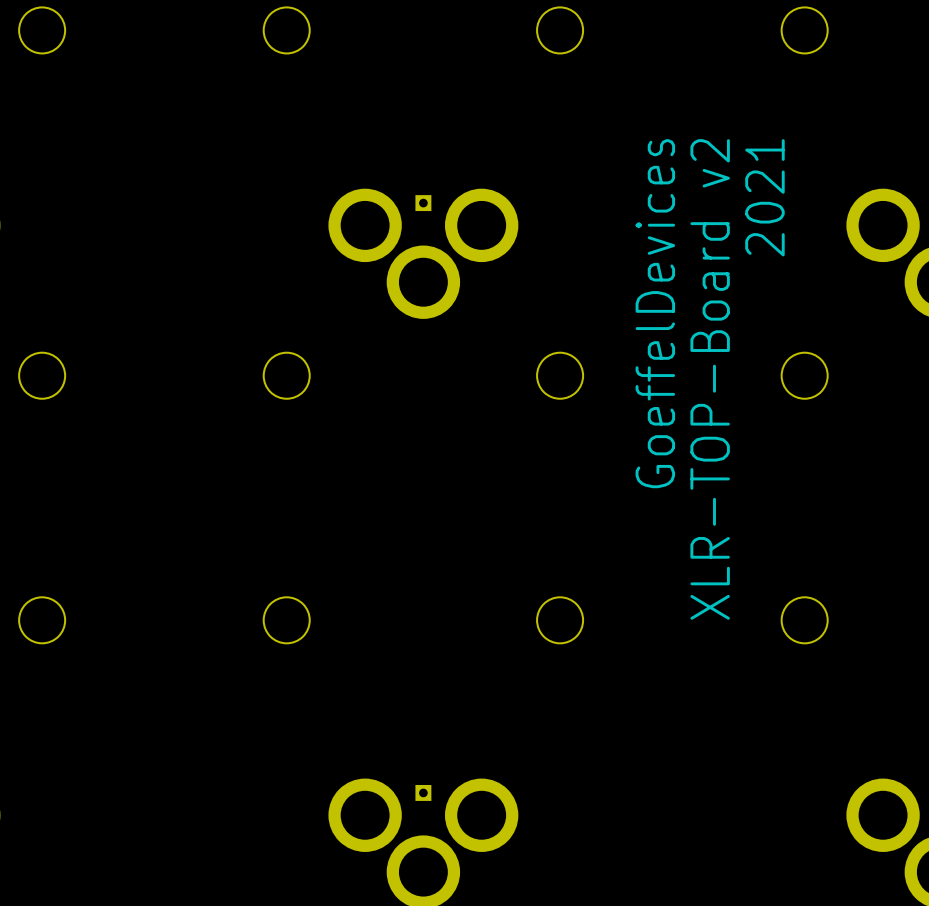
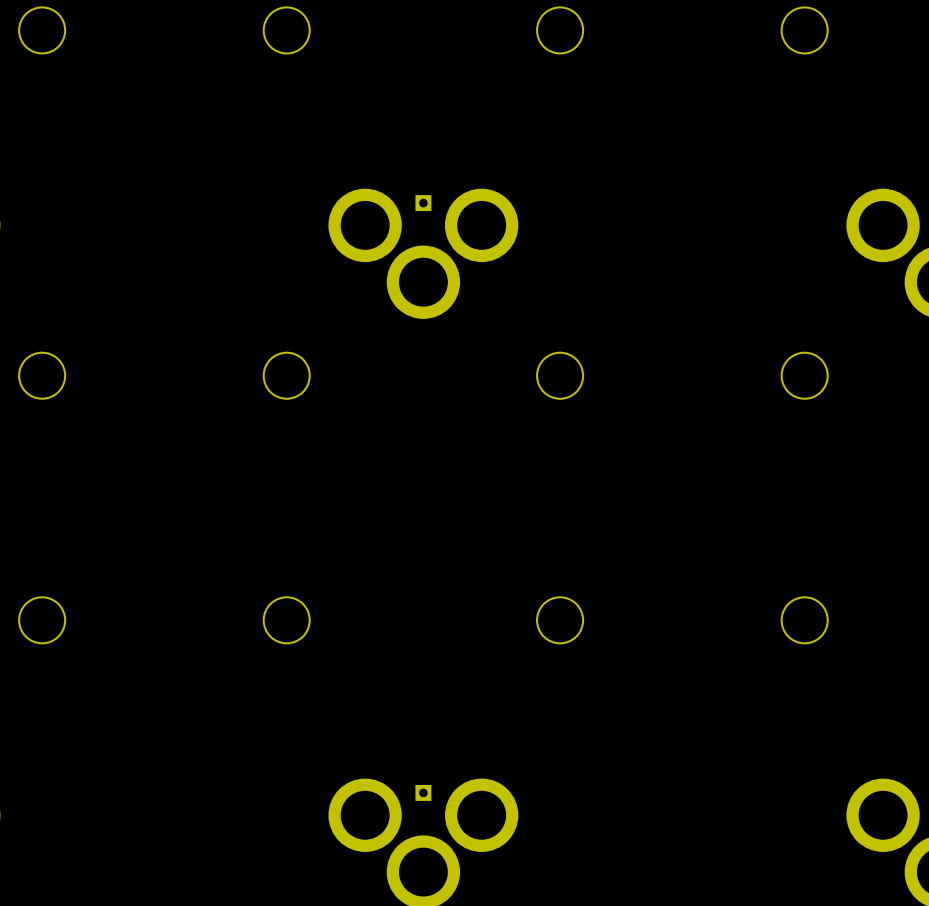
text: 2021 (764, 197) -> none
text: GoeffelDevices (655, 313) -> none
text: XLR-TOP-Board v2 (710, 379) -> none

